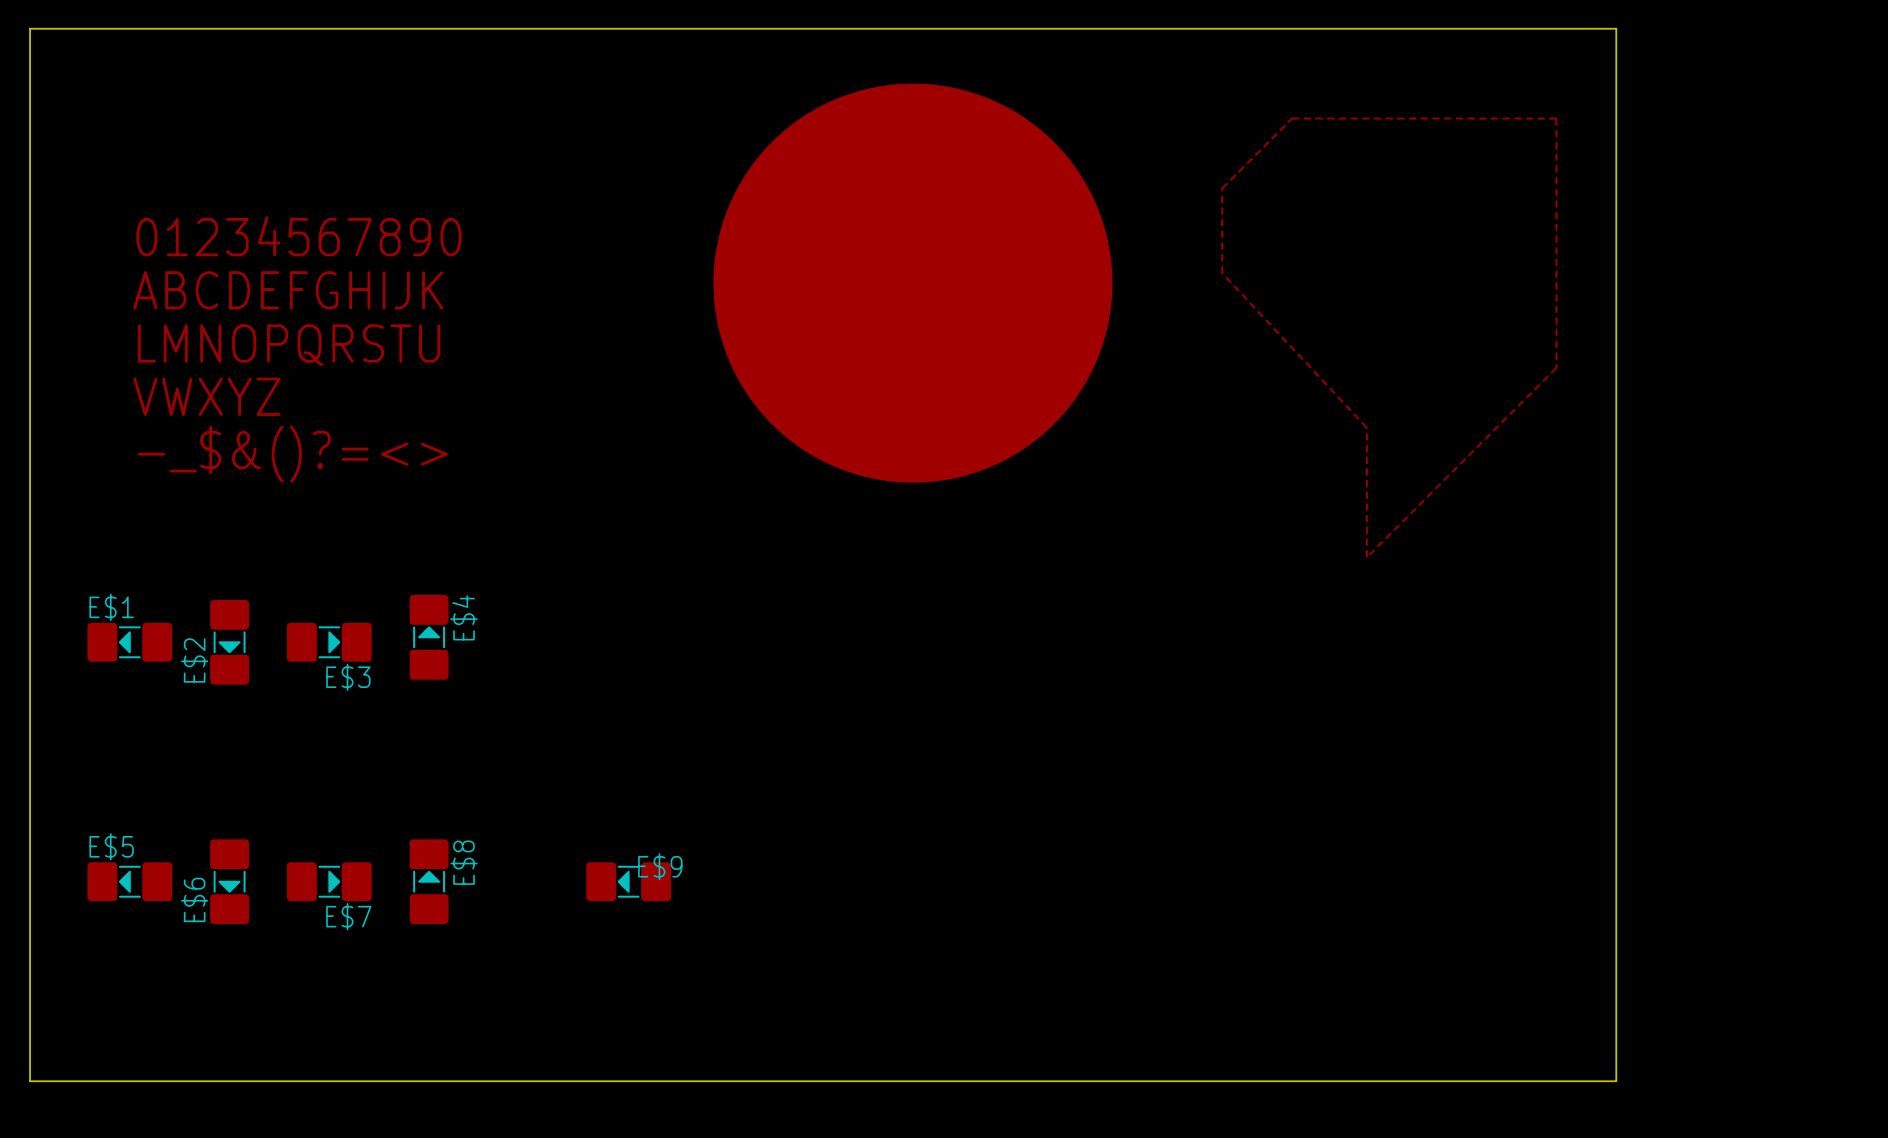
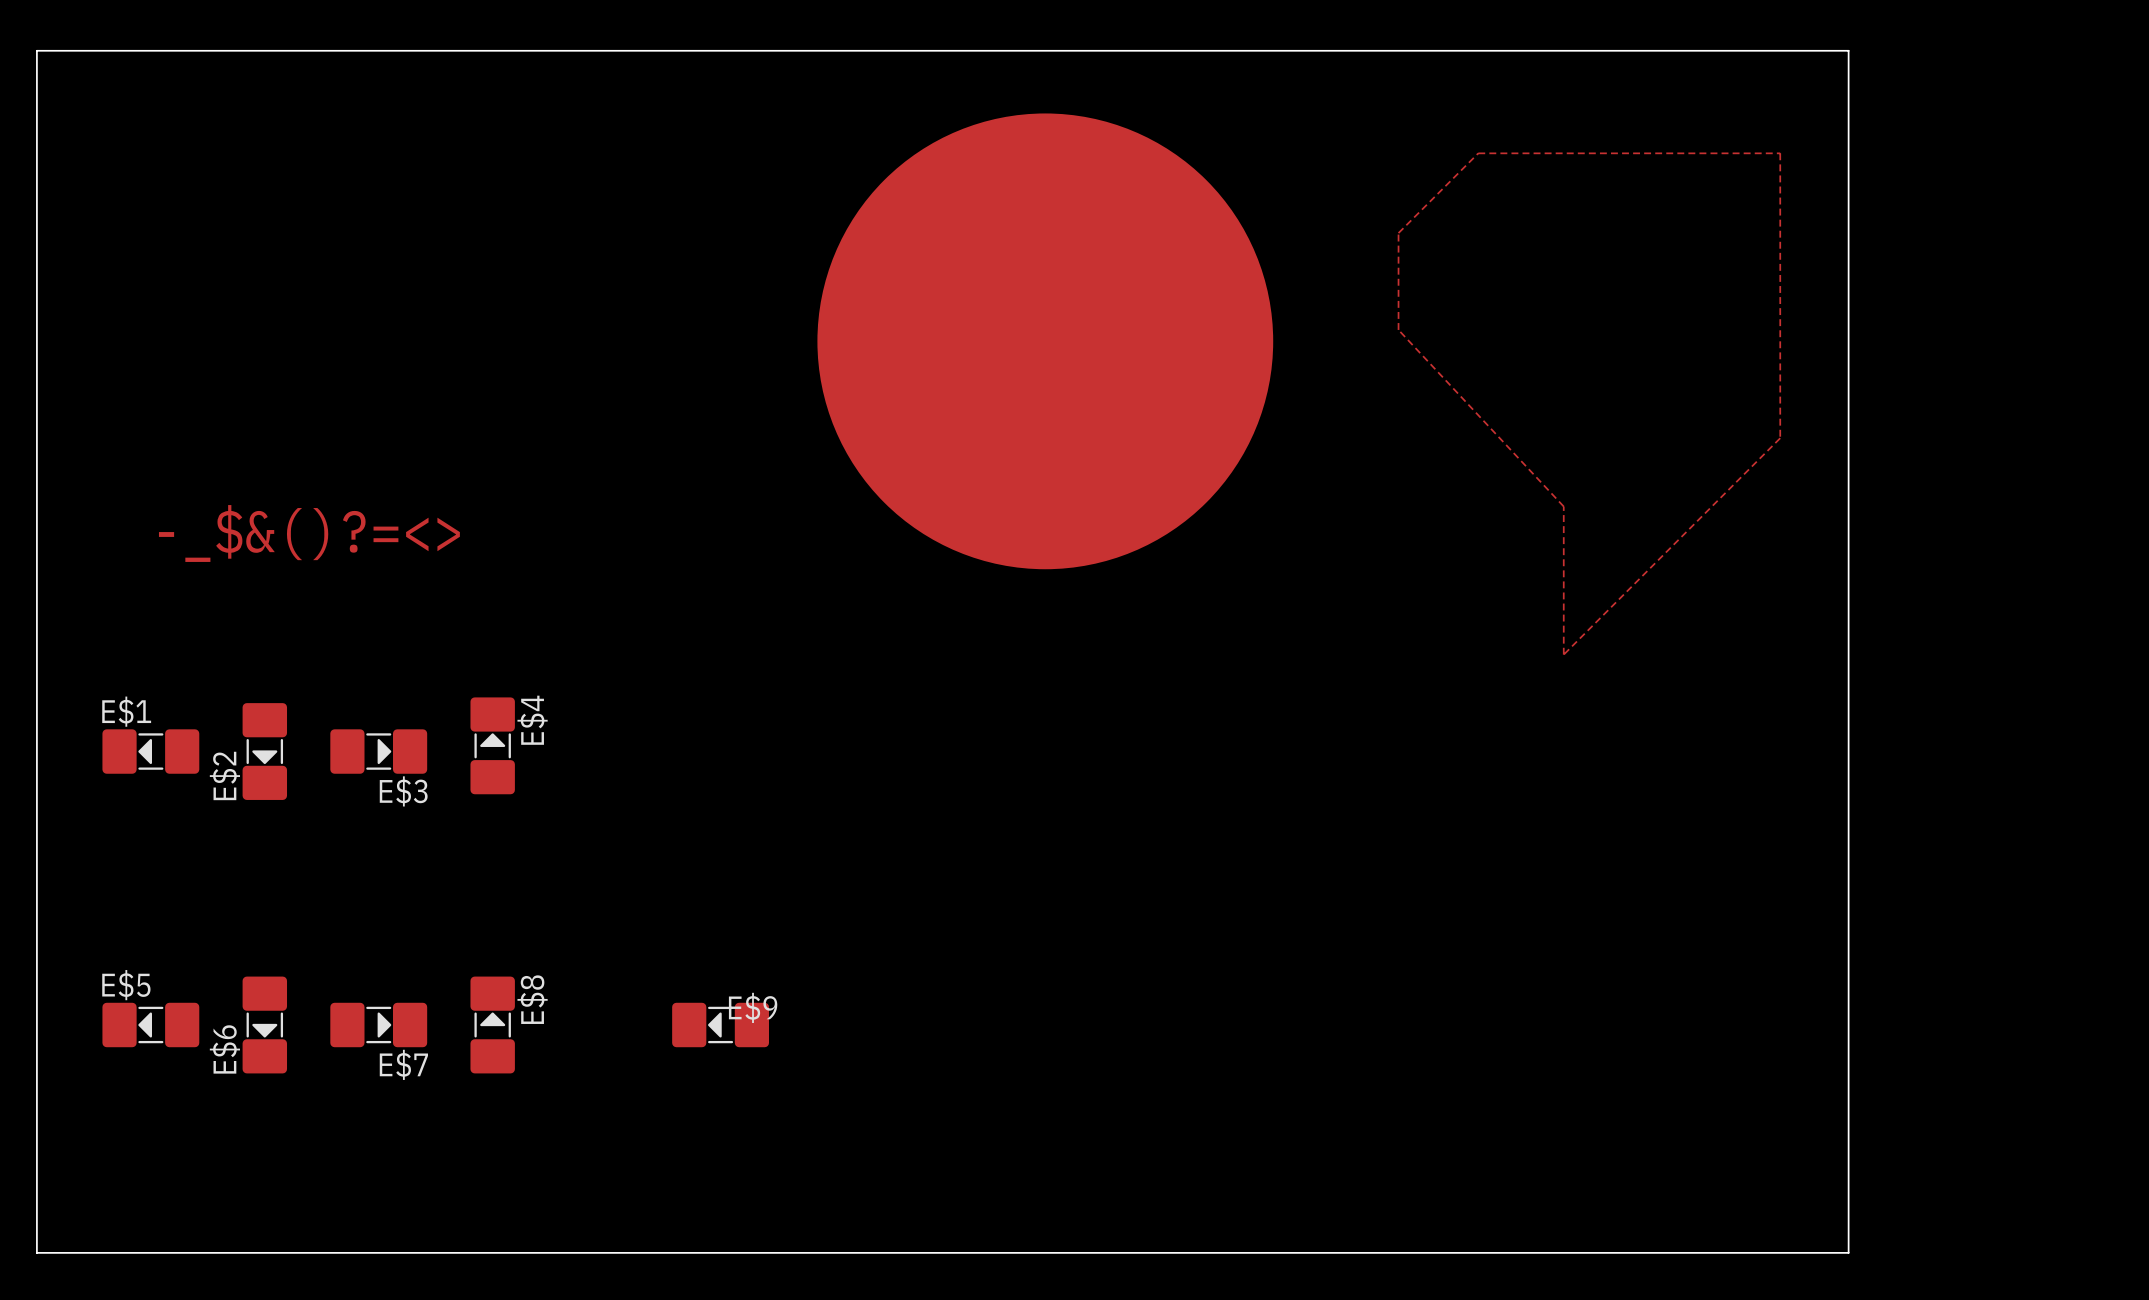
text: 01234567890 (298, 236) -> none
text: ABCDEFGHIJK (288, 290) -> none
text: LMNOPQRSTU (289, 345) -> none
text: VWXYZ (206, 396) -> none

